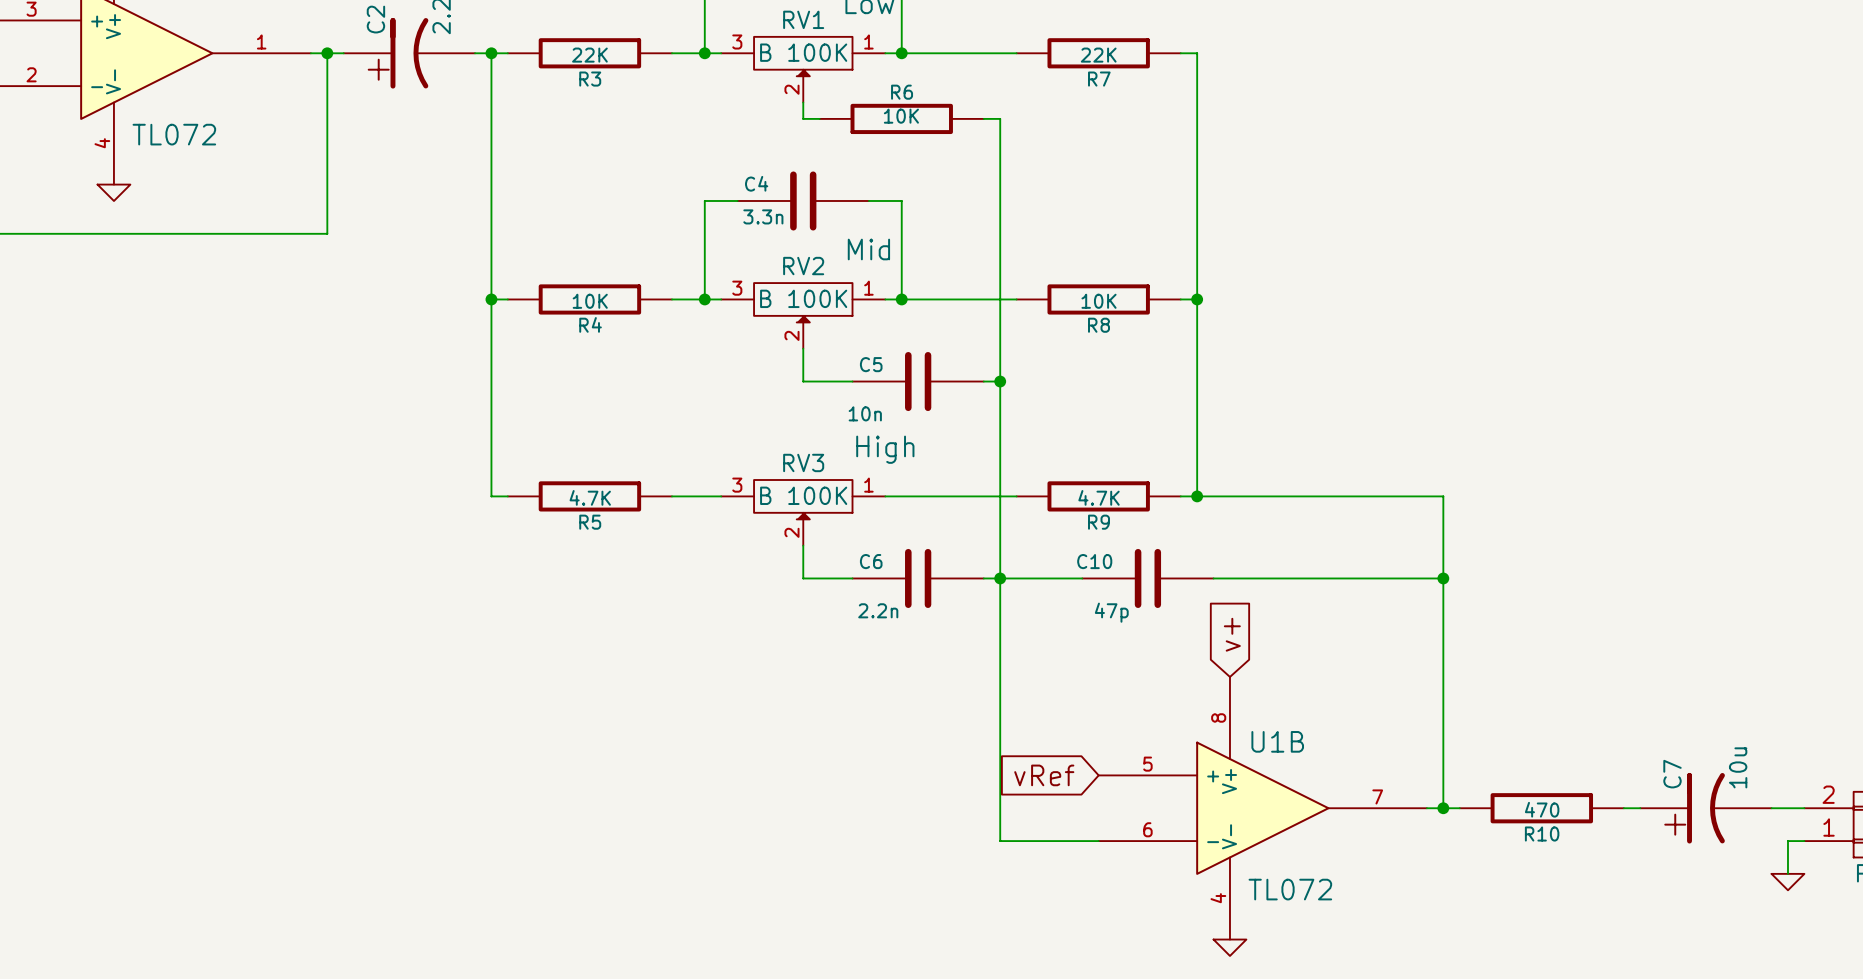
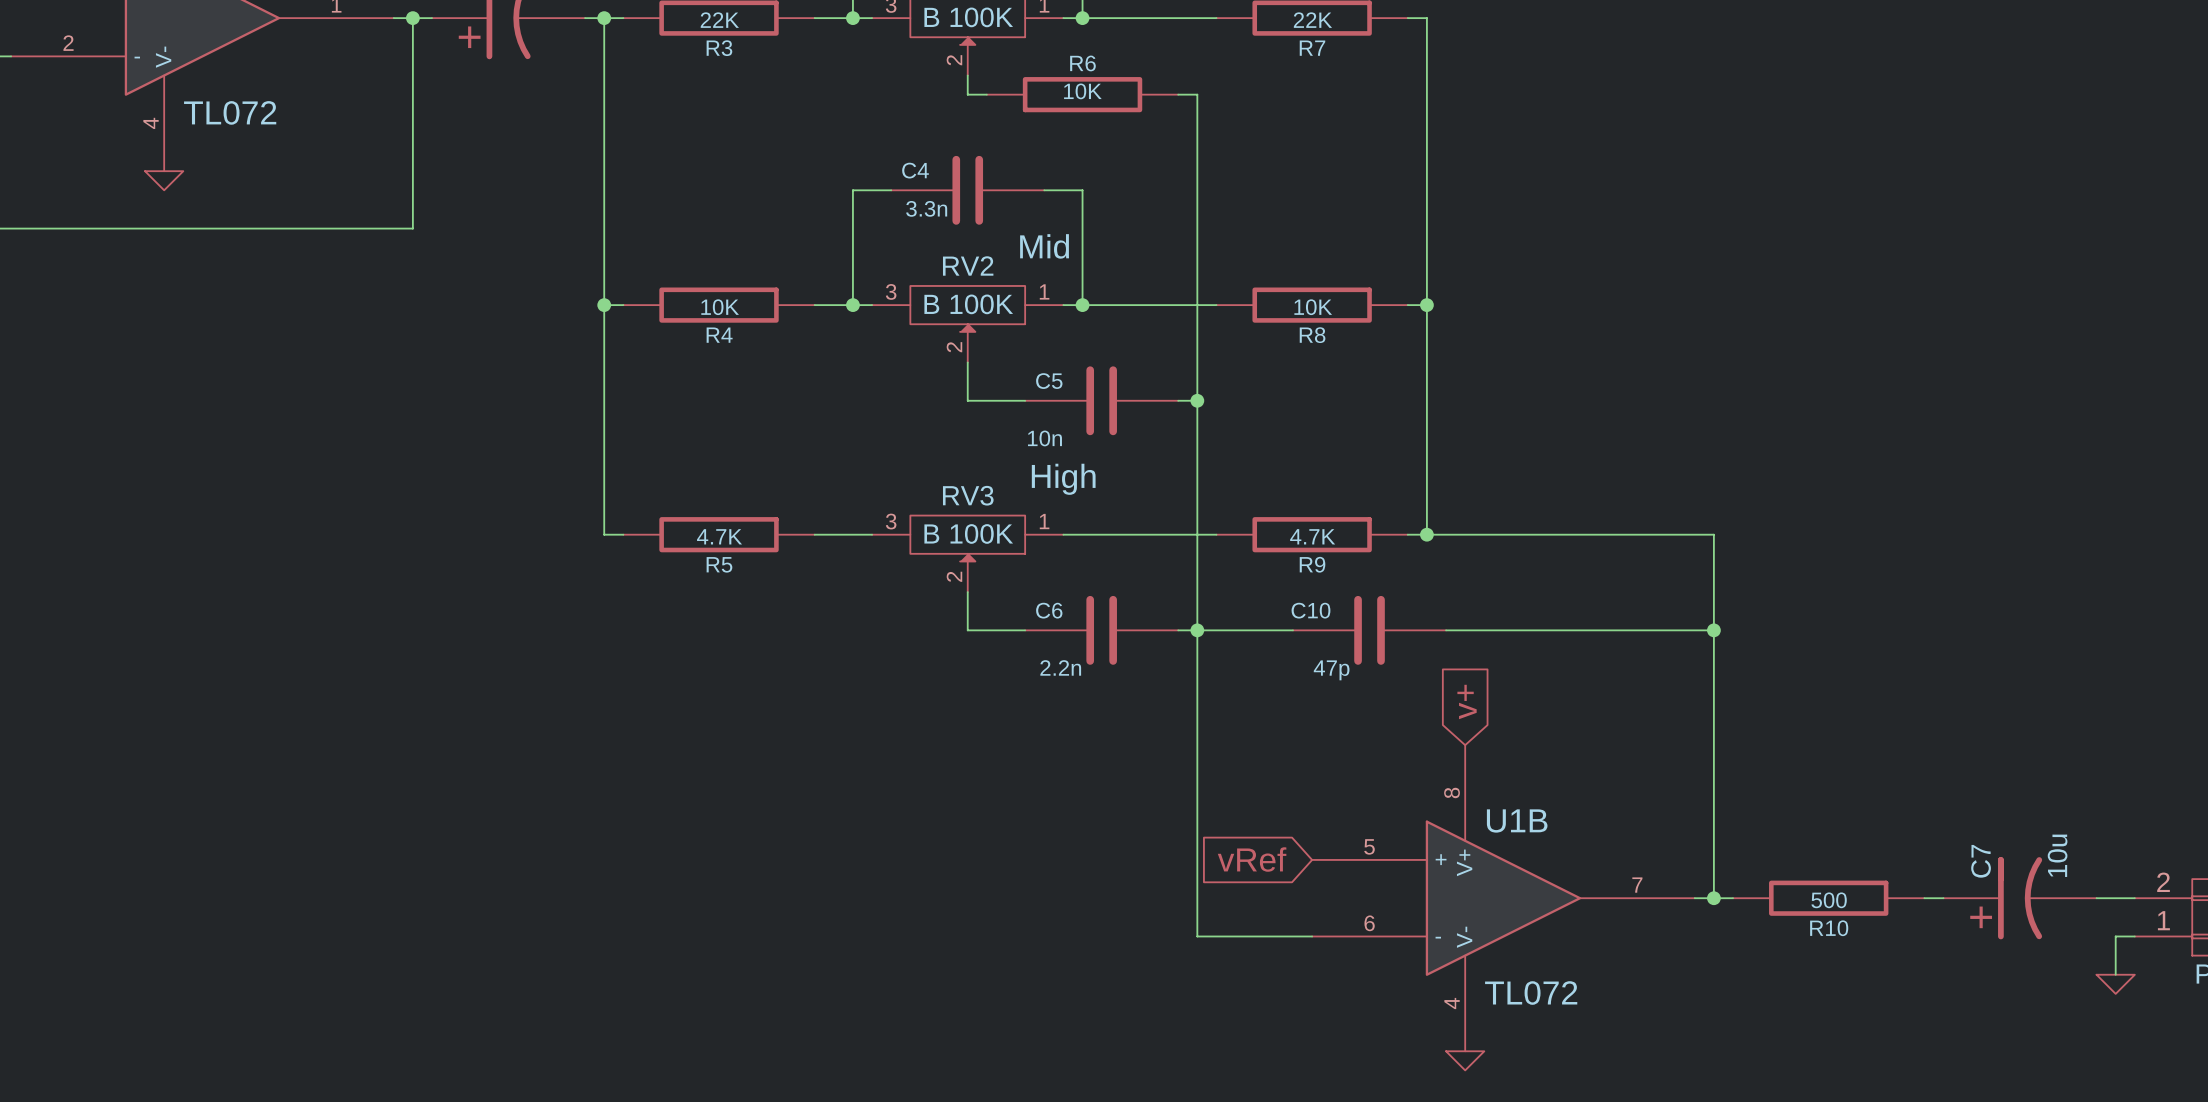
R10 value: 470 (1542, 809) -> 500 (1829, 900)

